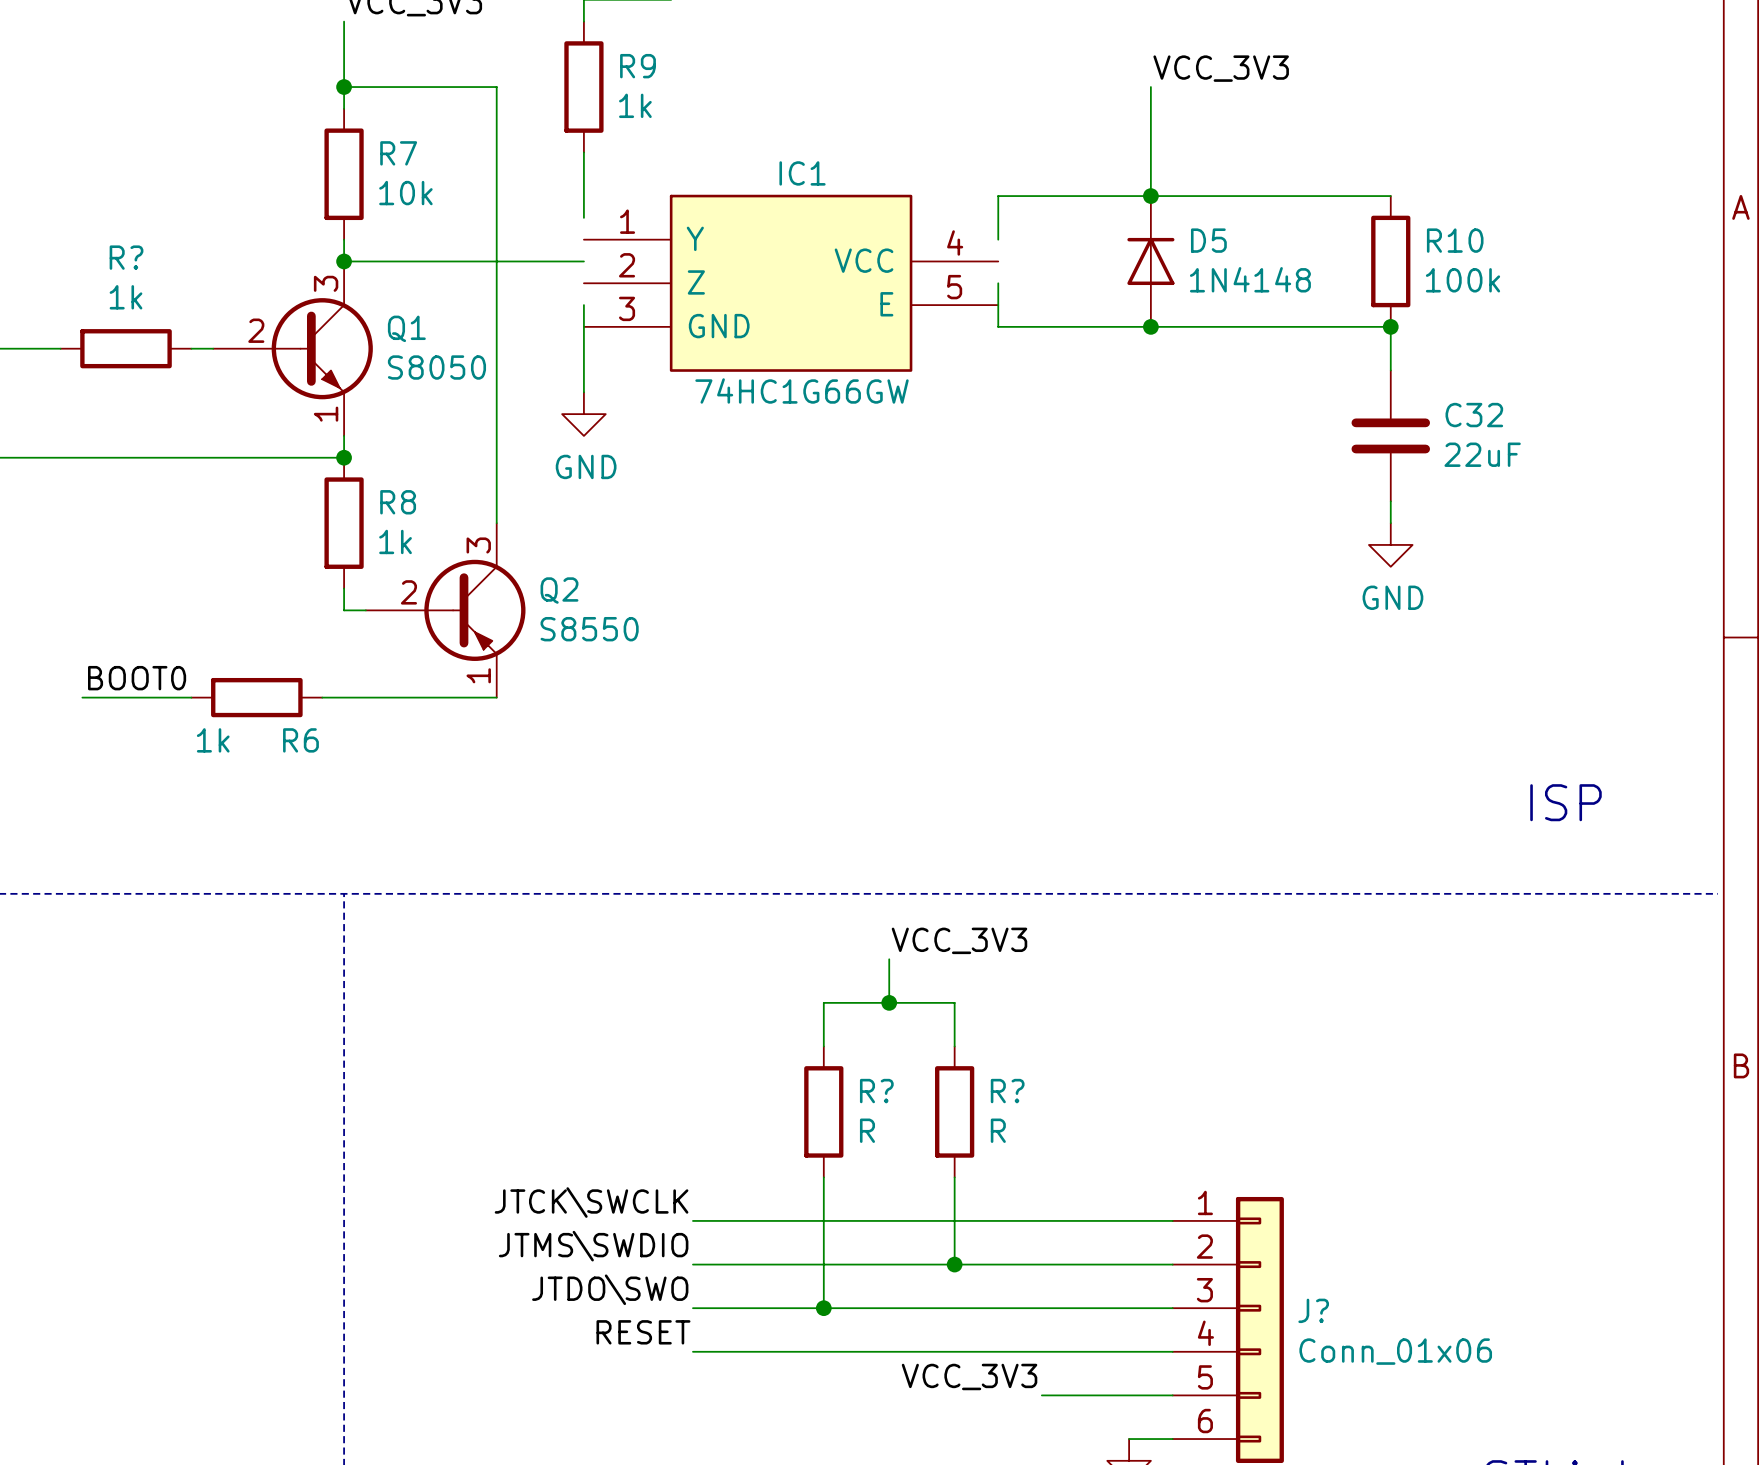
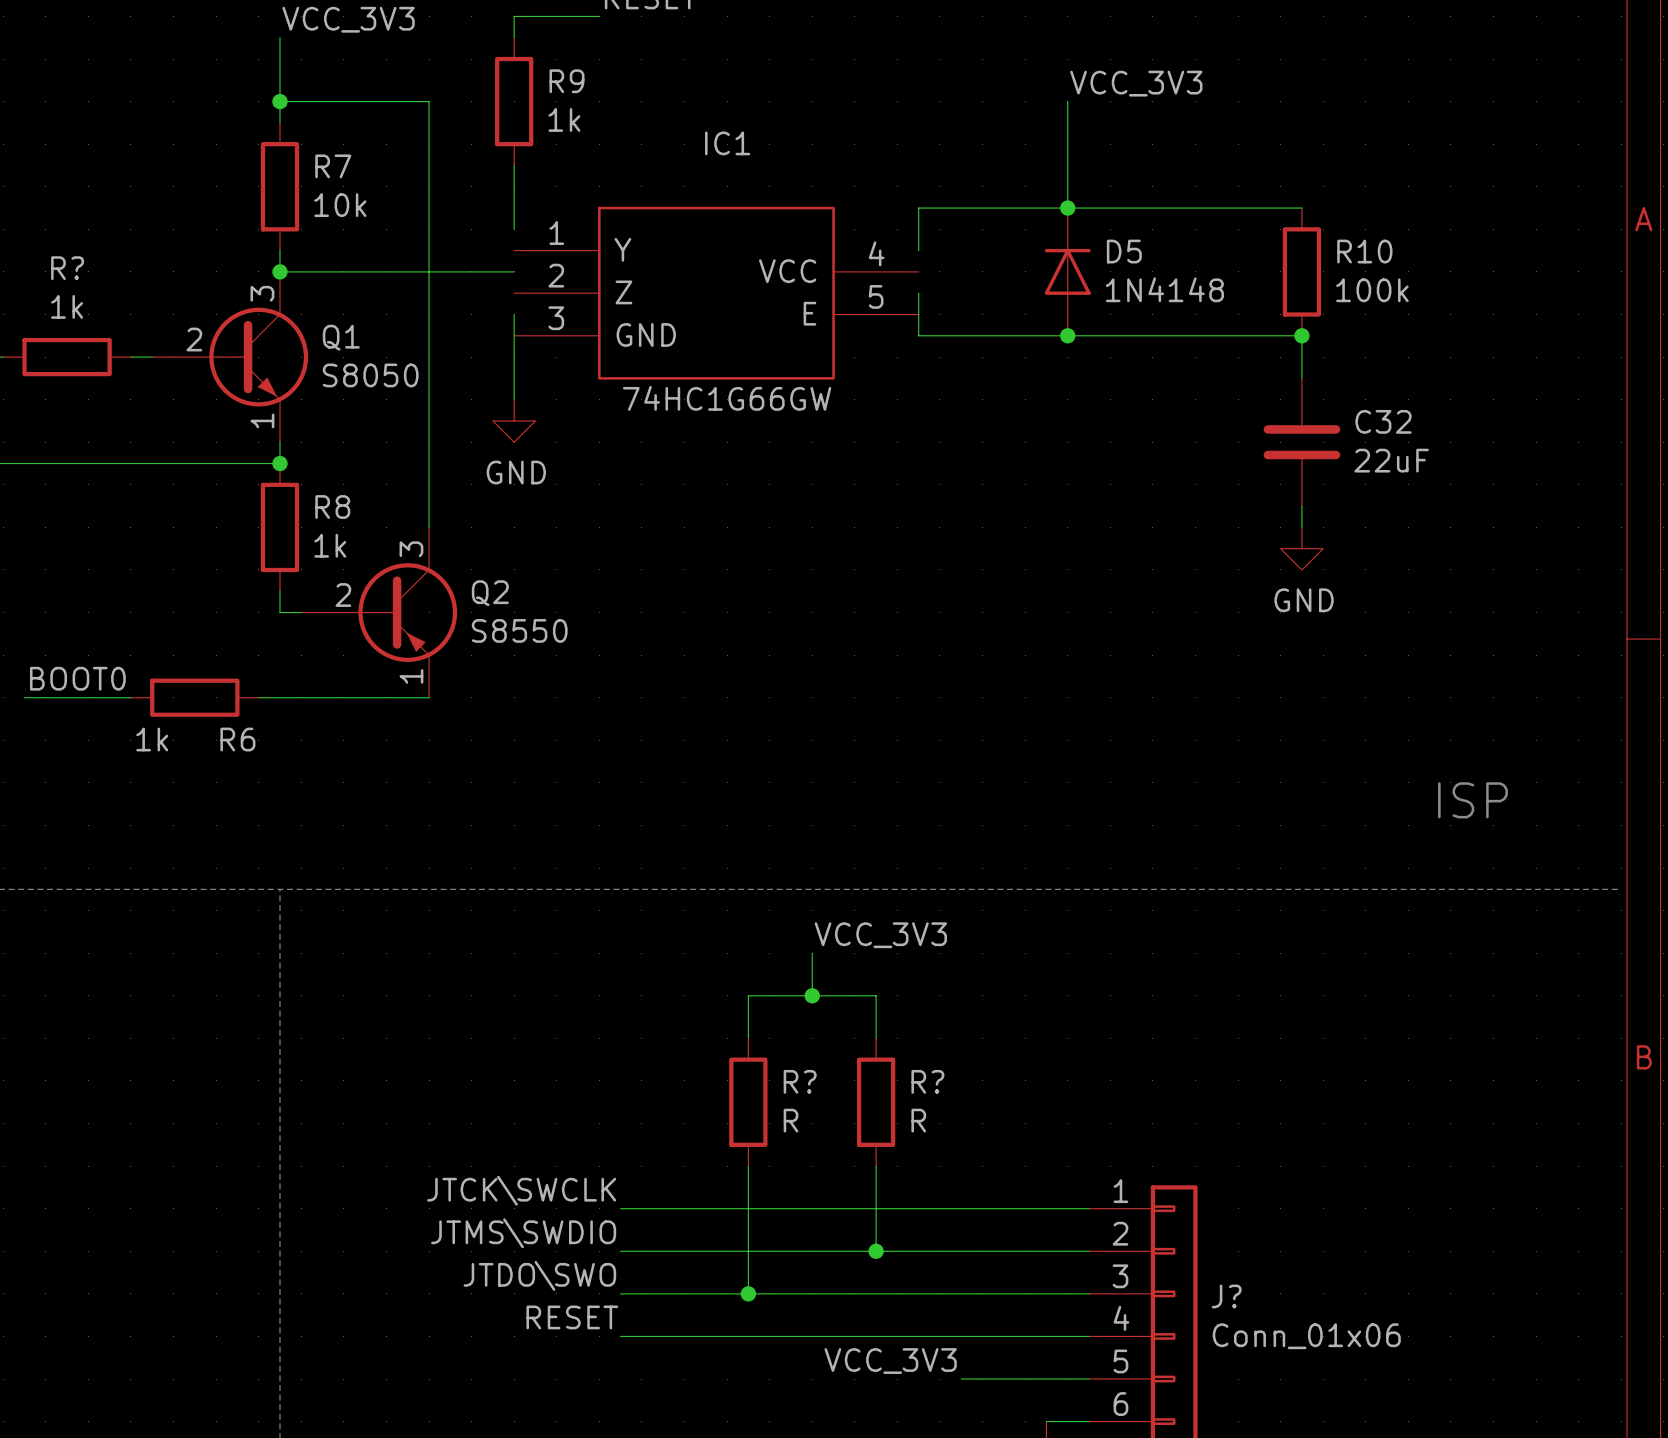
IC1 name position: IC1 (802, 173) -> IC1 (727, 143)

